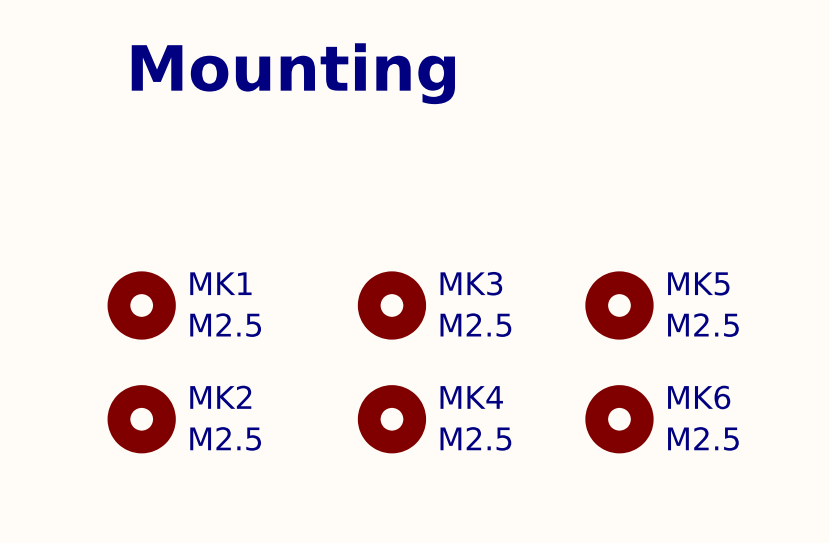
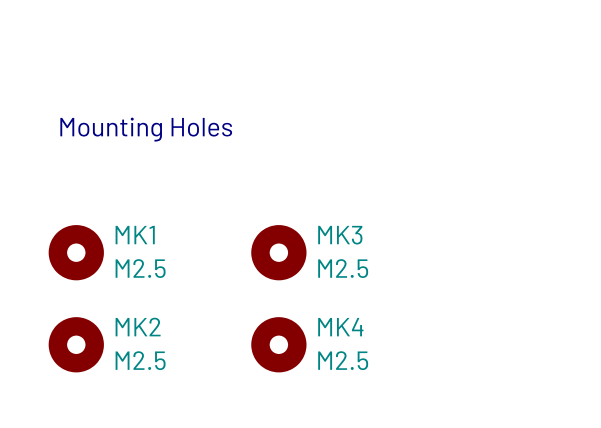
text: Mounting (293, 73) -> none
text: none -> Mounting Holes (146, 129)
MK5: M2.5 (619, 305) -> none
MK6: M2.5 (619, 419) -> none

